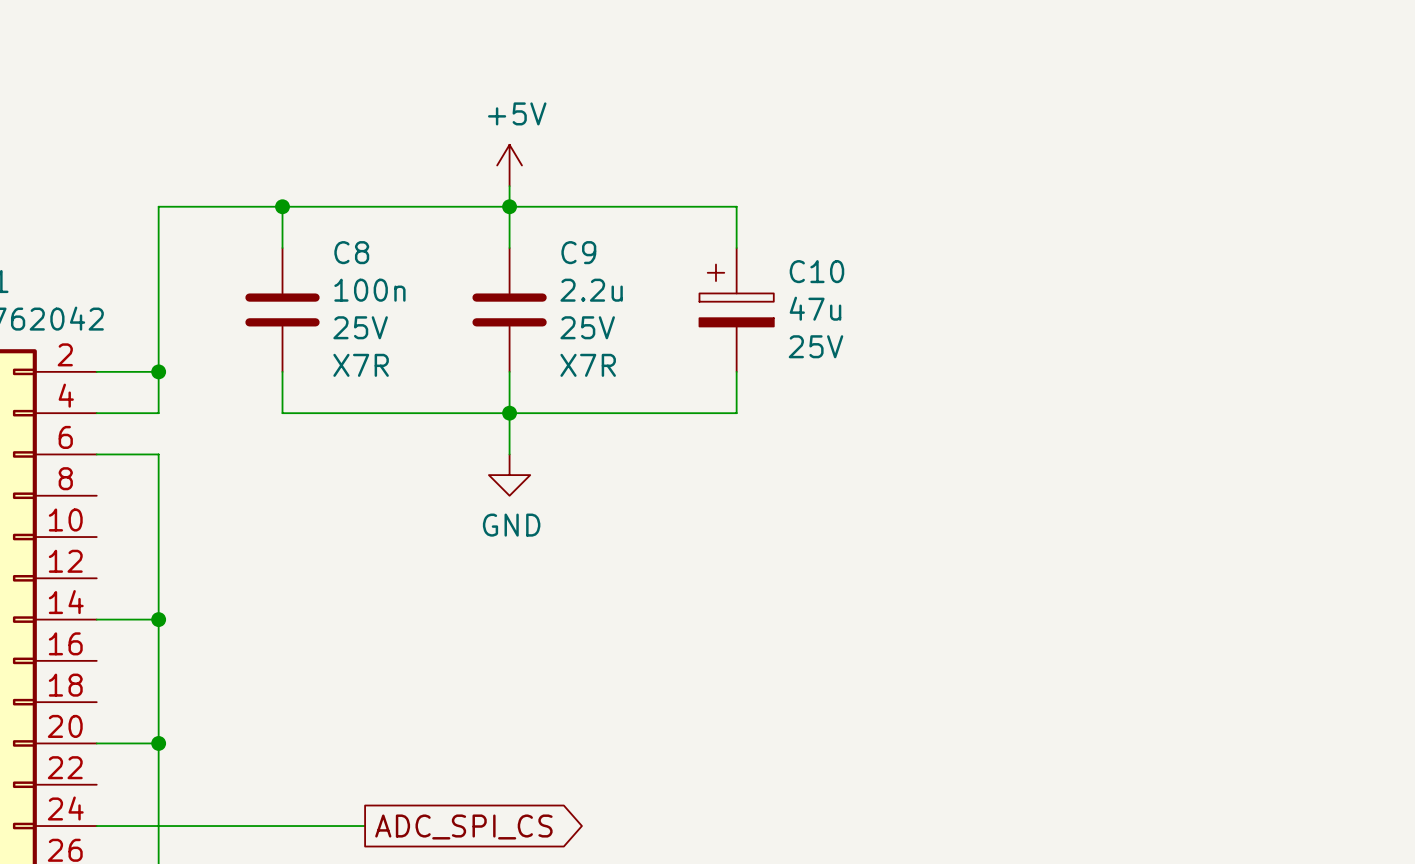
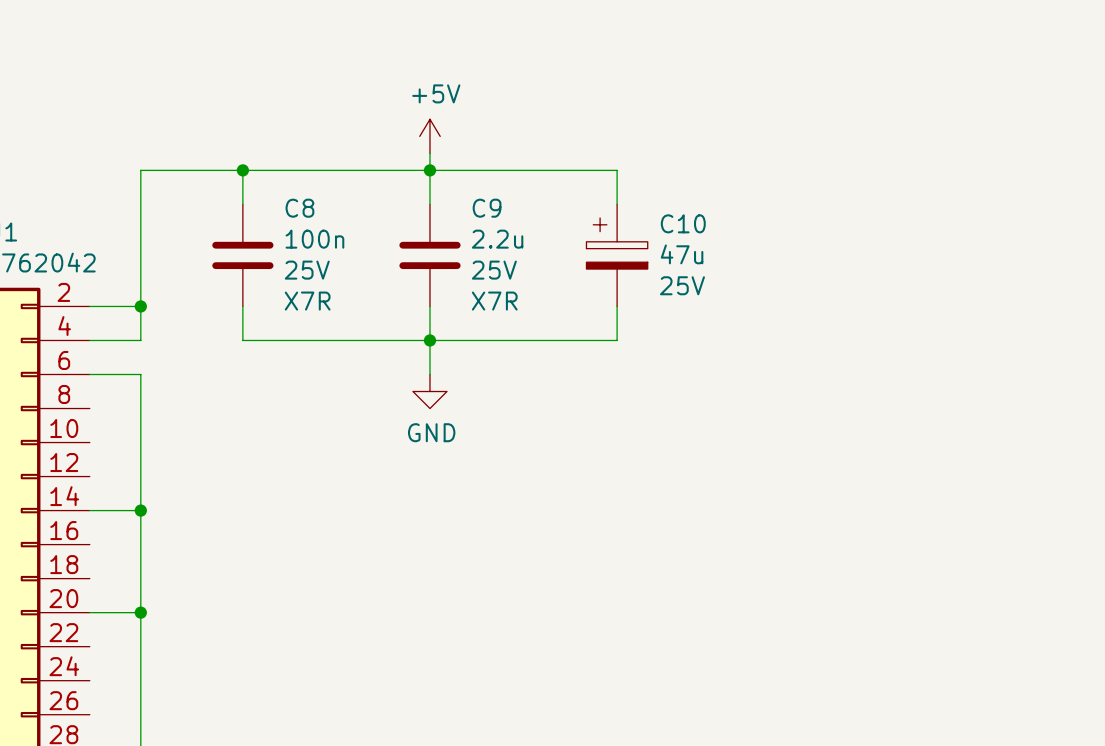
wire: (96, 826) (365, 826) -> none
global label: ADC_SPI_CS (463, 827) -> none

